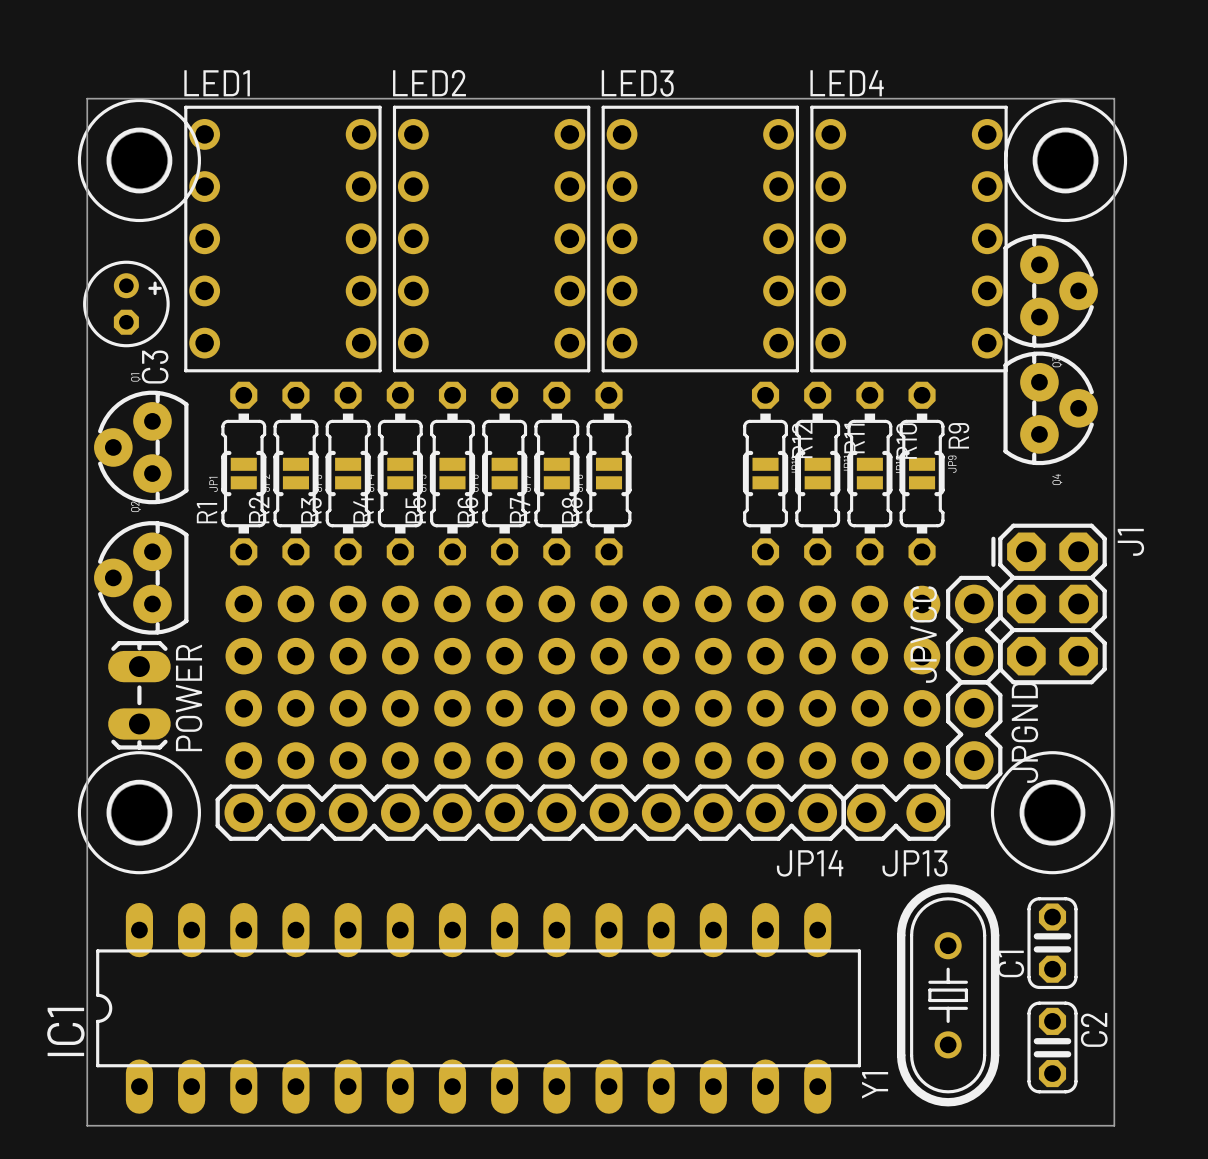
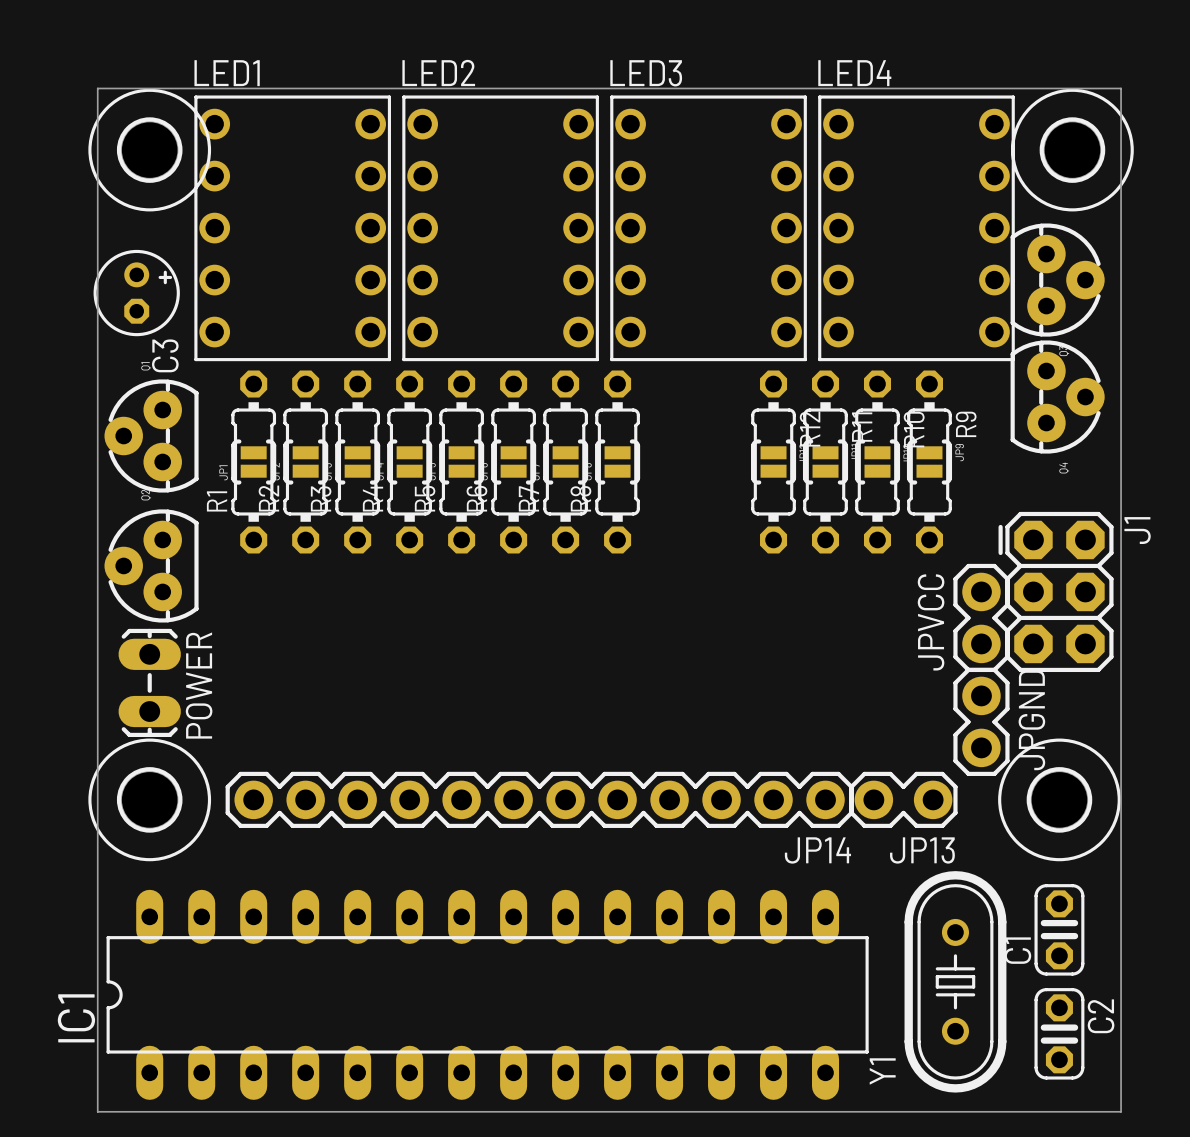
part: (400, 603) -> none
part: (765, 603) -> none
part: (400, 656) -> none
part: (765, 656) -> none
part: (400, 708) -> none
part: (765, 708) -> none
part: (400, 760) -> none
part: (765, 760) -> none

